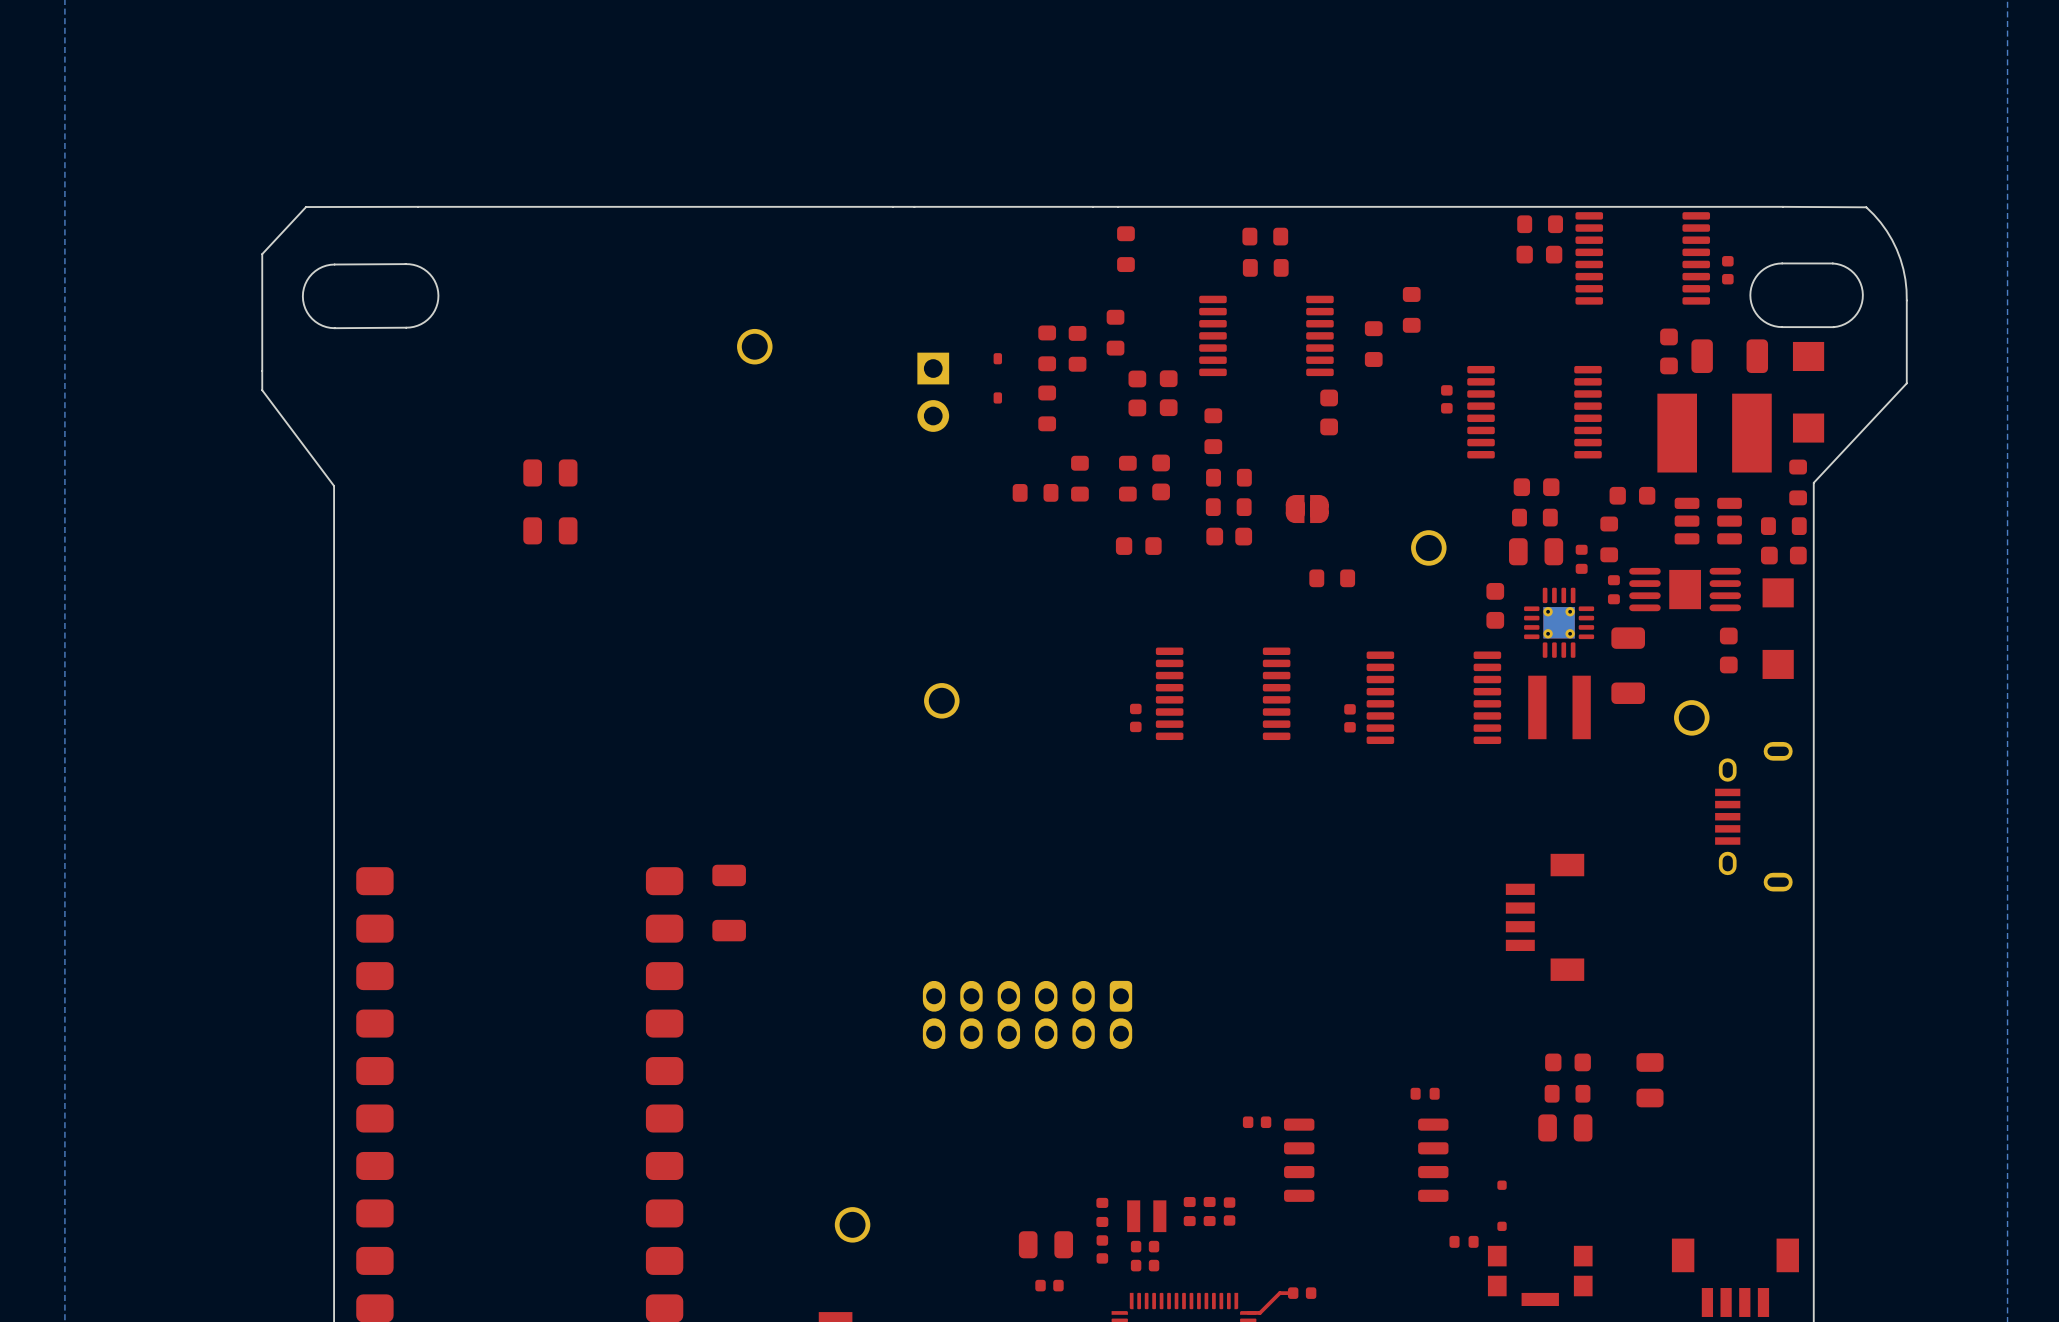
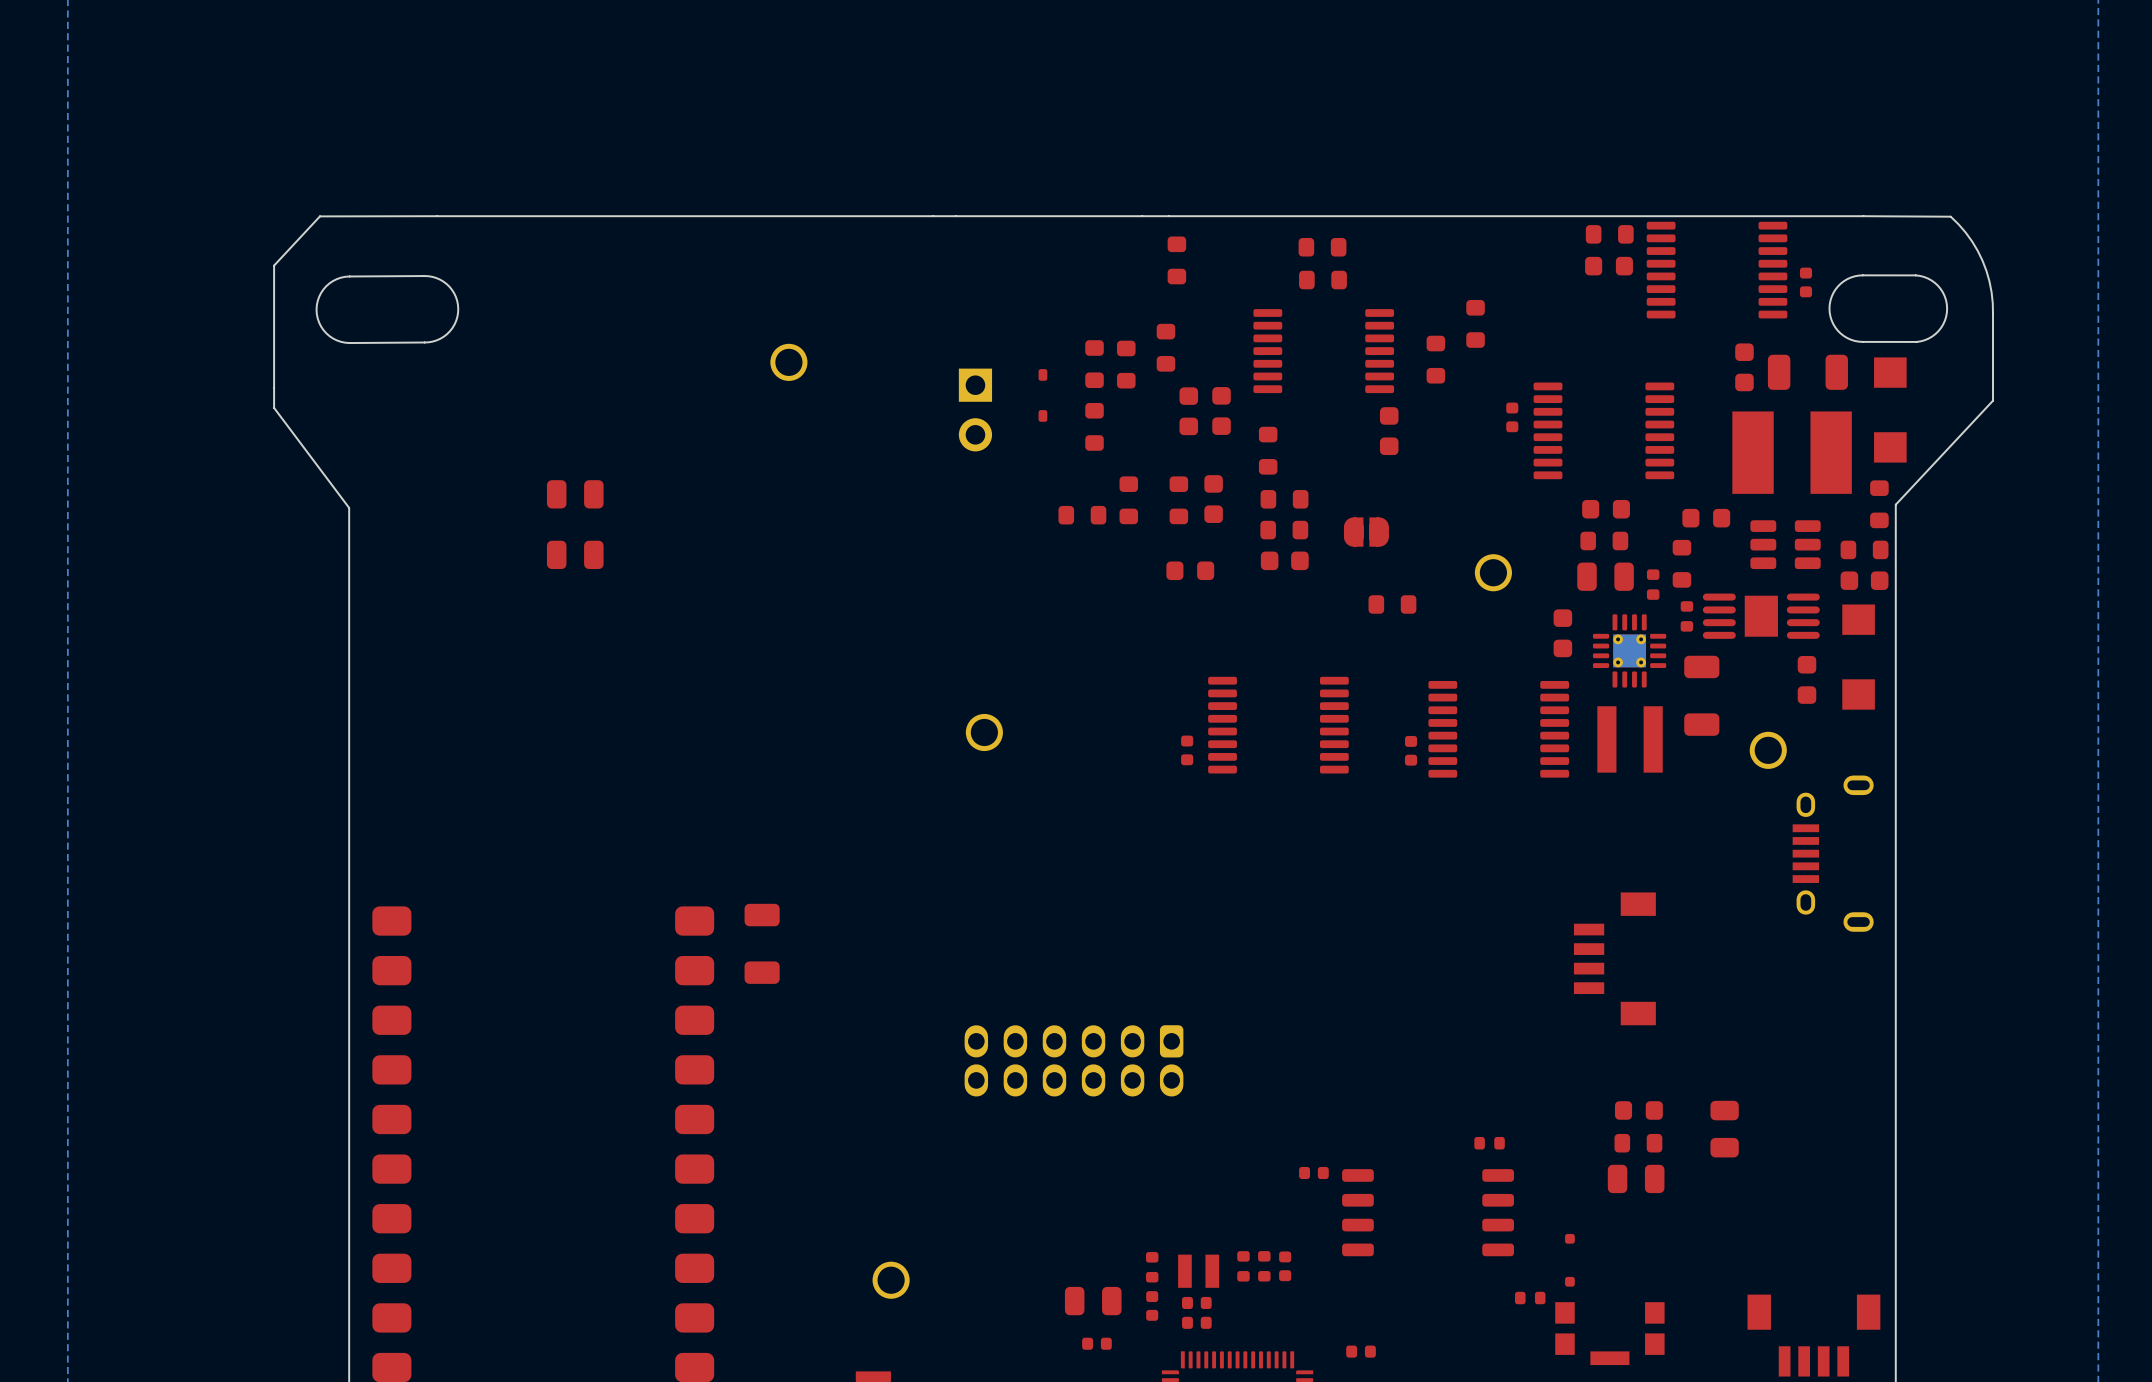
top track: (1293, 1293) (1279, 1293) (1260, 1312) (1248, 1312) -> none

